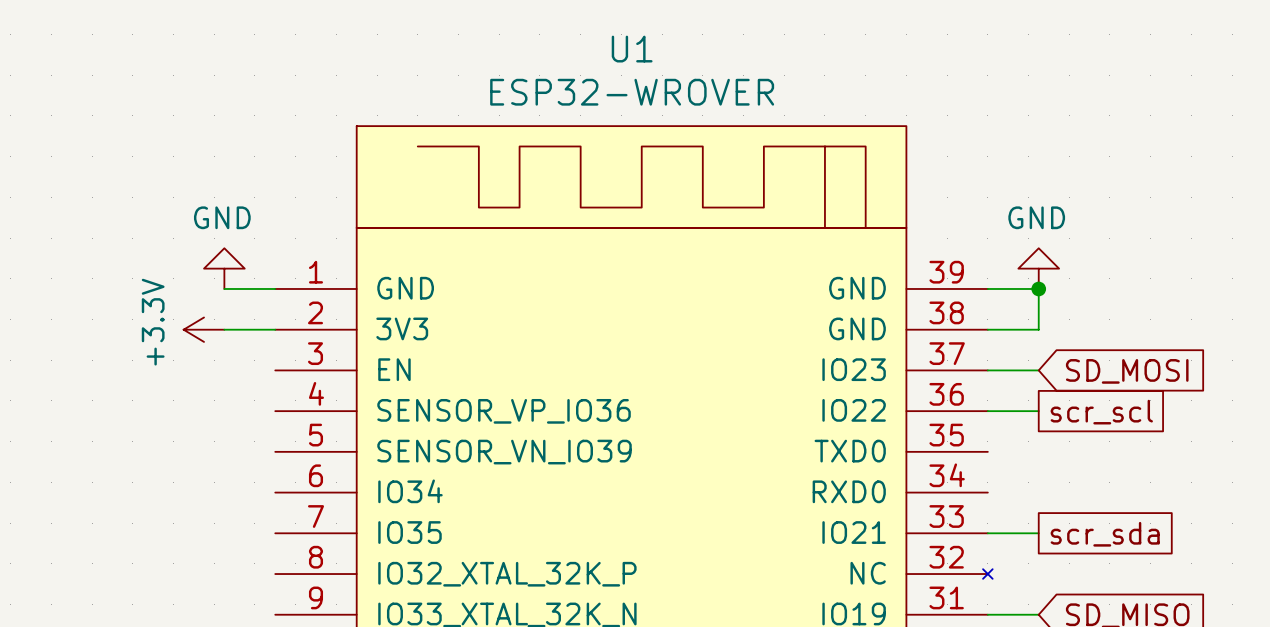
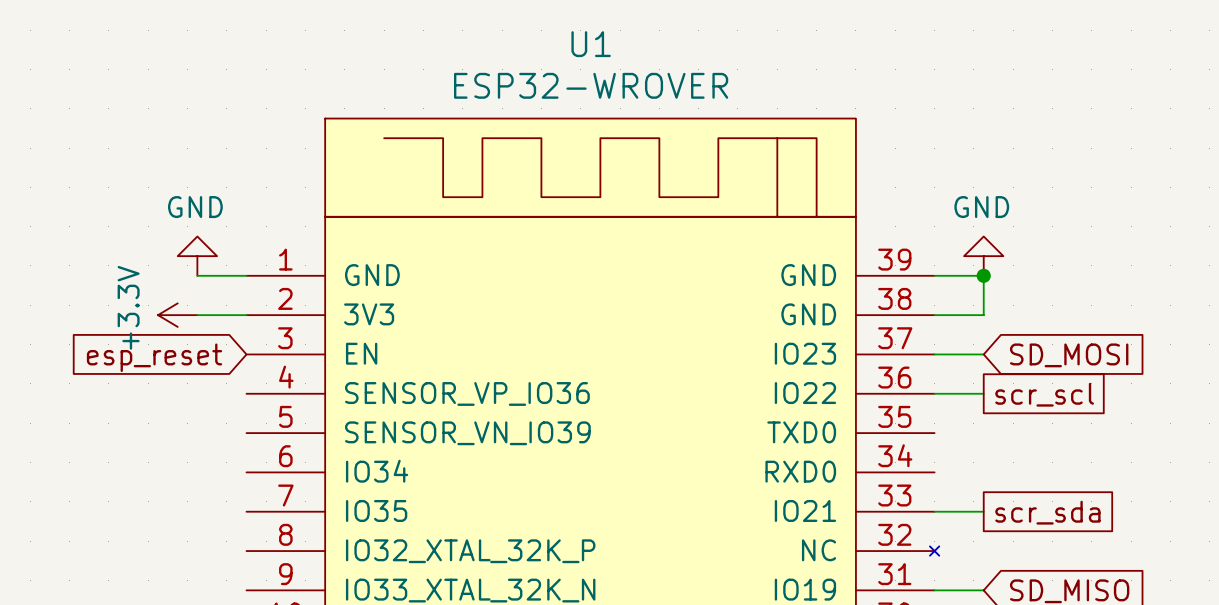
global label: none -> esp_reset (154, 357)

